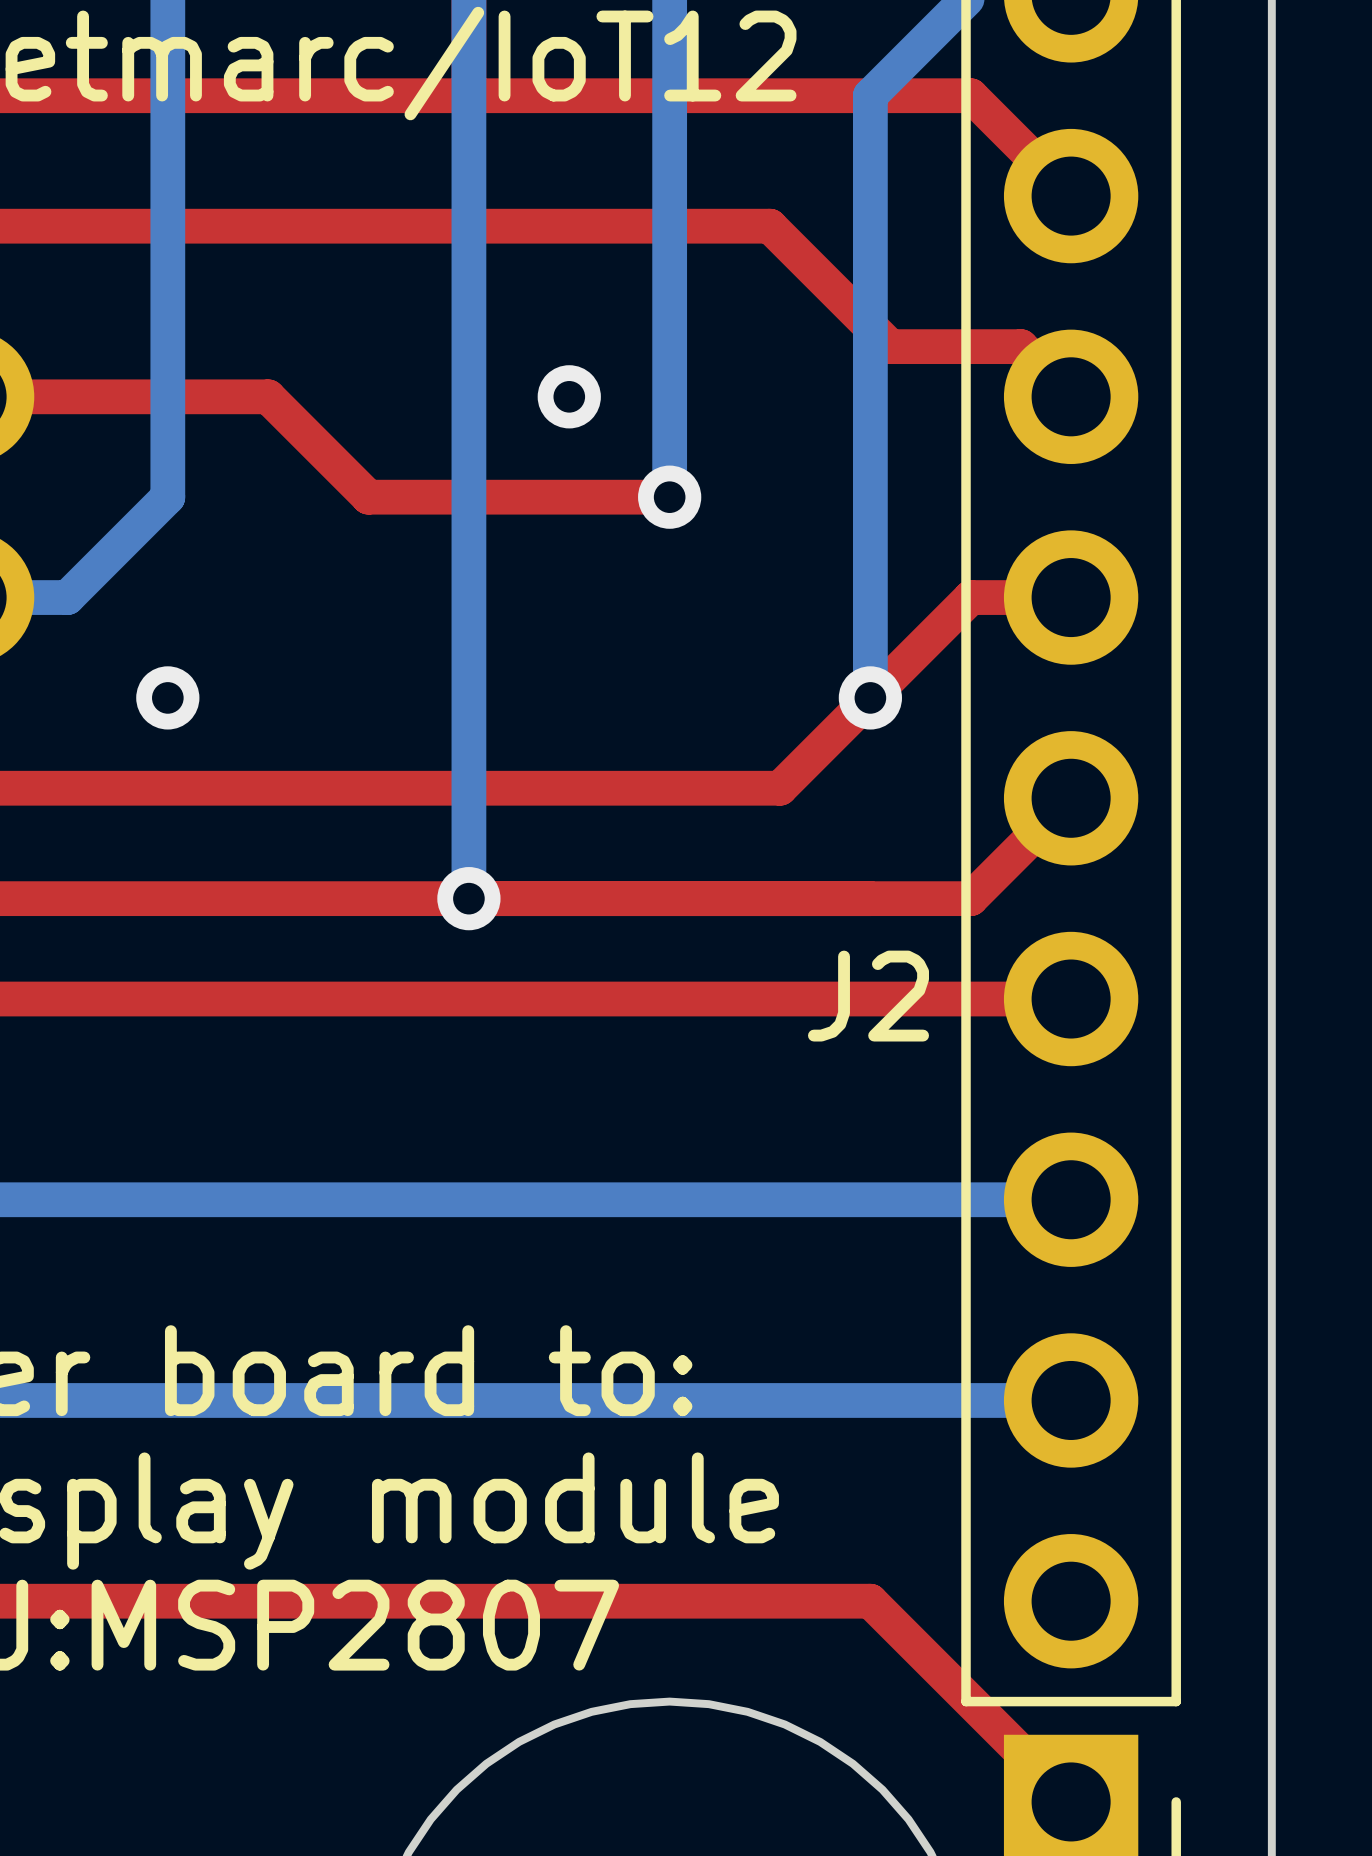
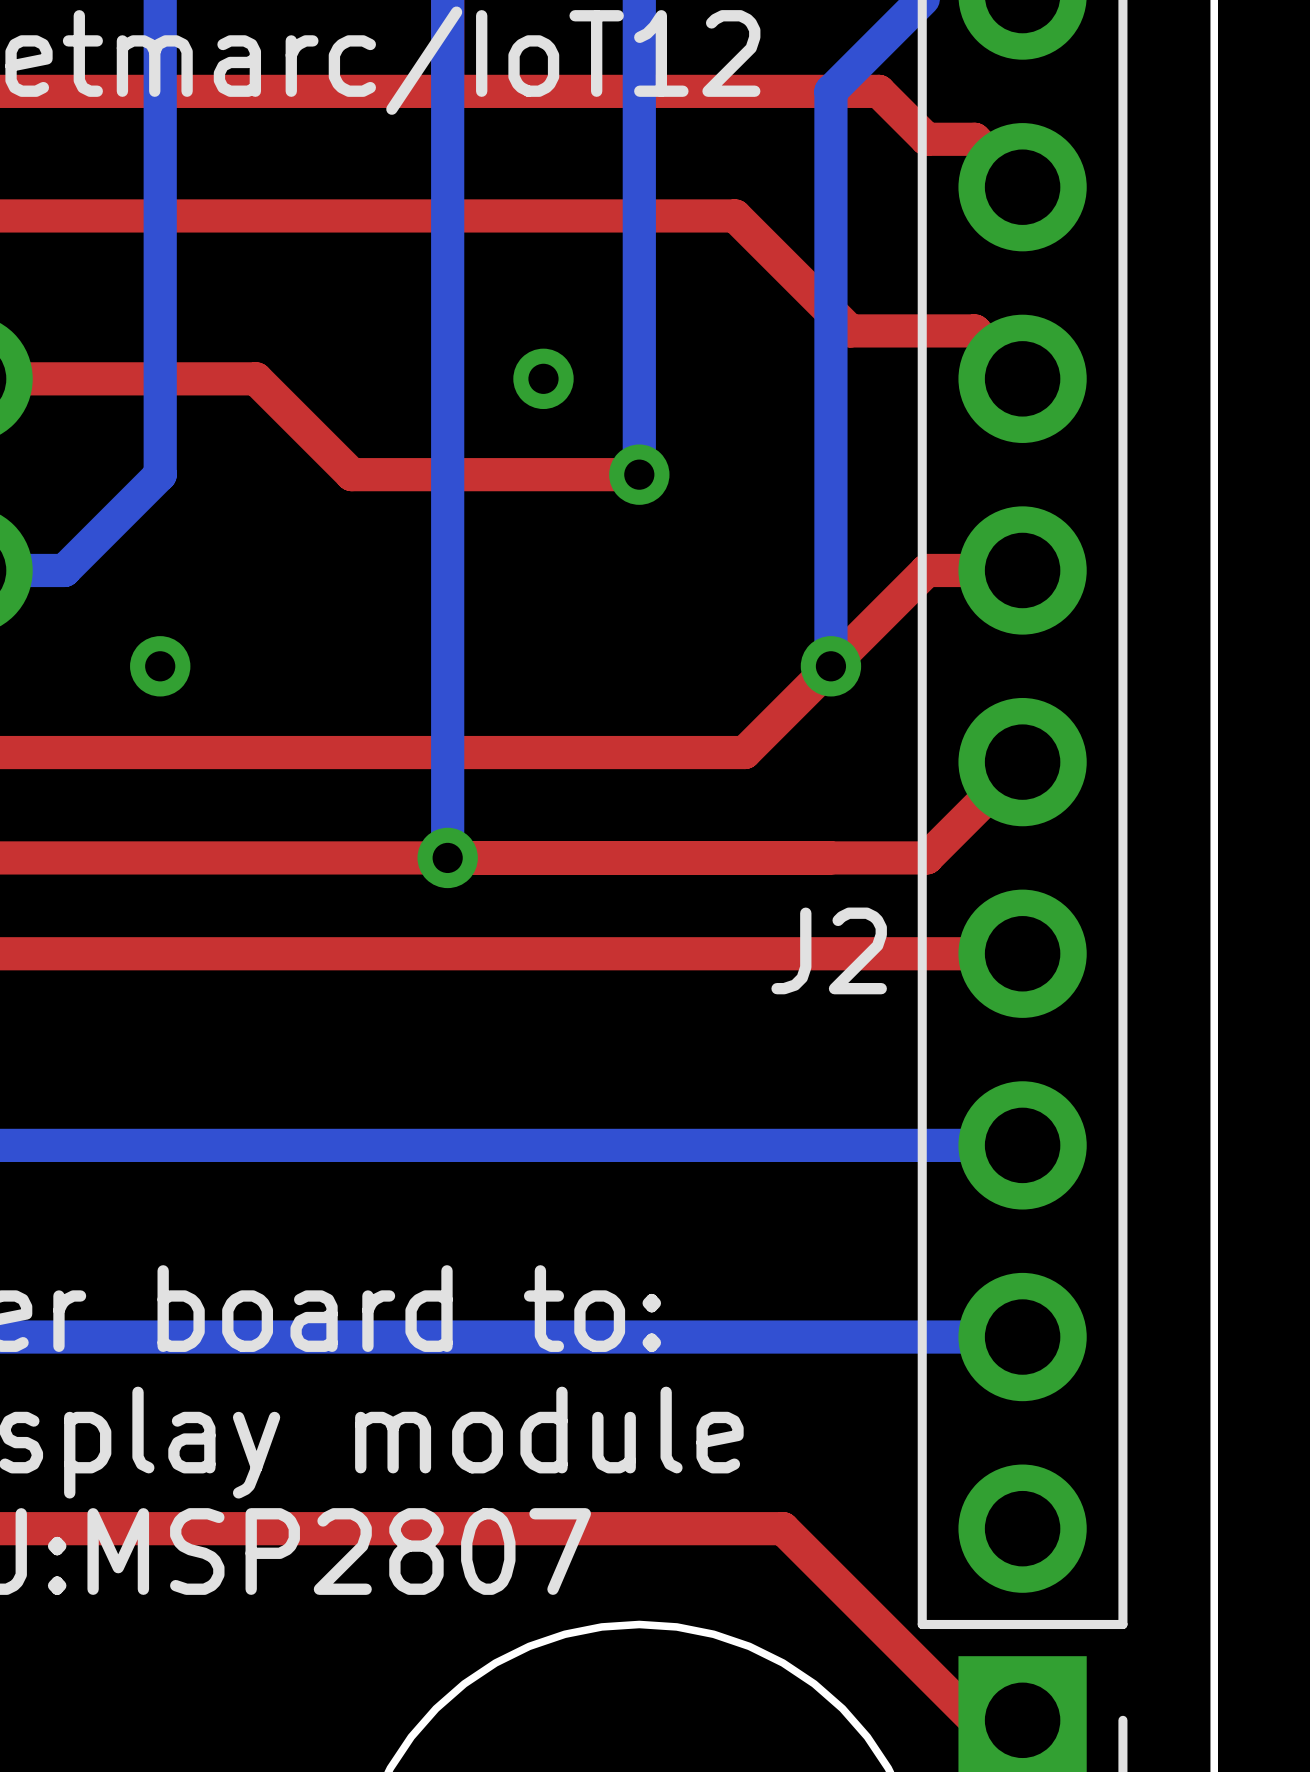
top track: (920, 95) (970, 95) (1020, 145) -> (878, 91) (926, 139) (974, 139)
top track: (820, 1601) (870, 1601) (1071, 1801) -> (783, 1528) (974, 1720) (1022, 1720)

